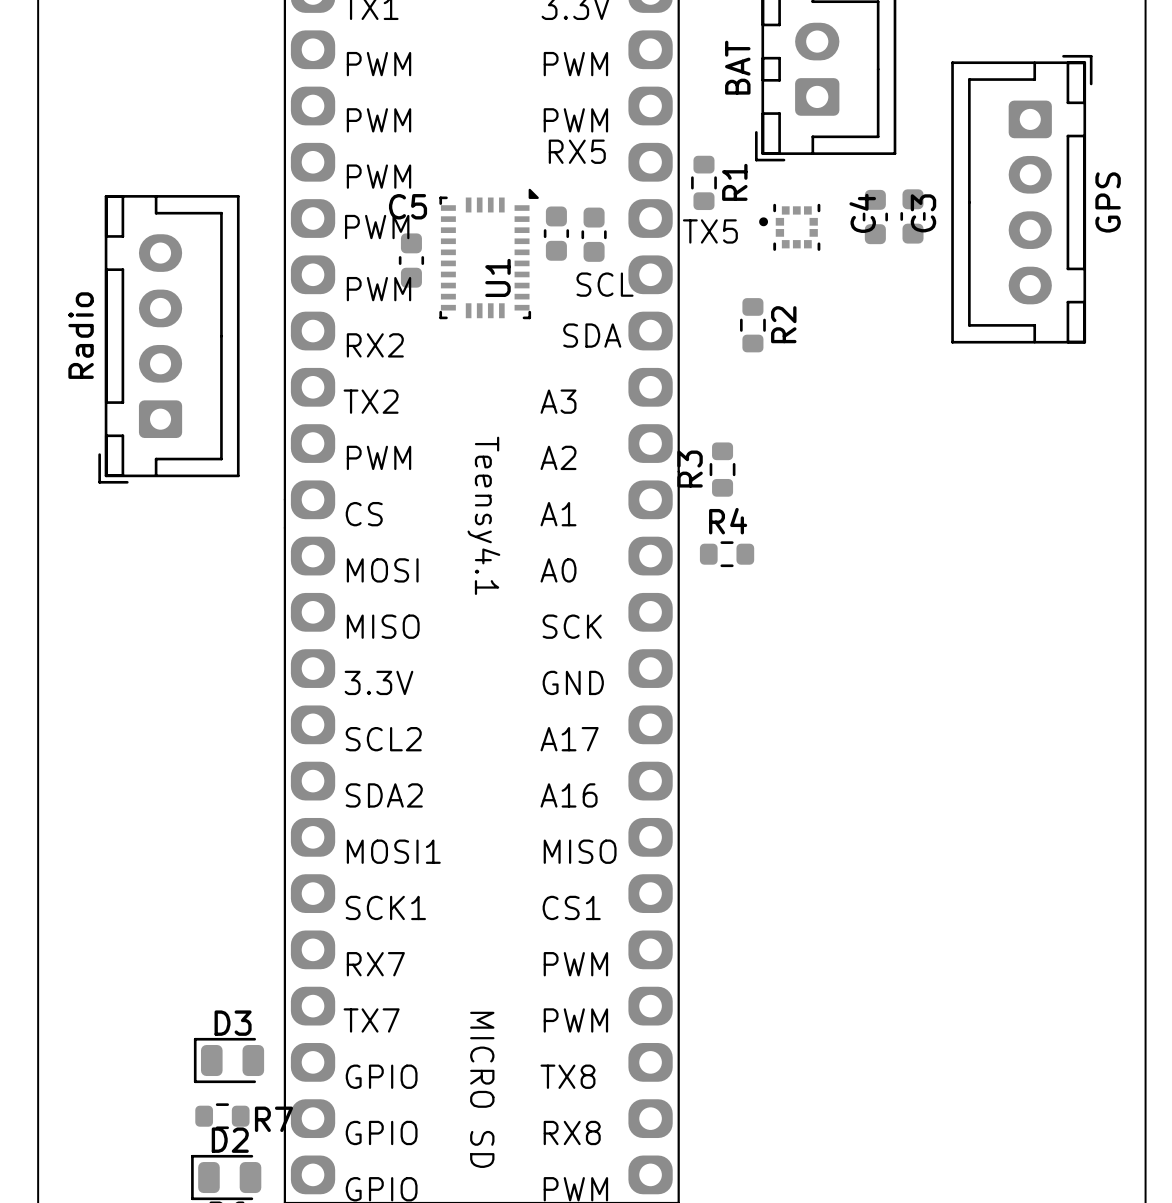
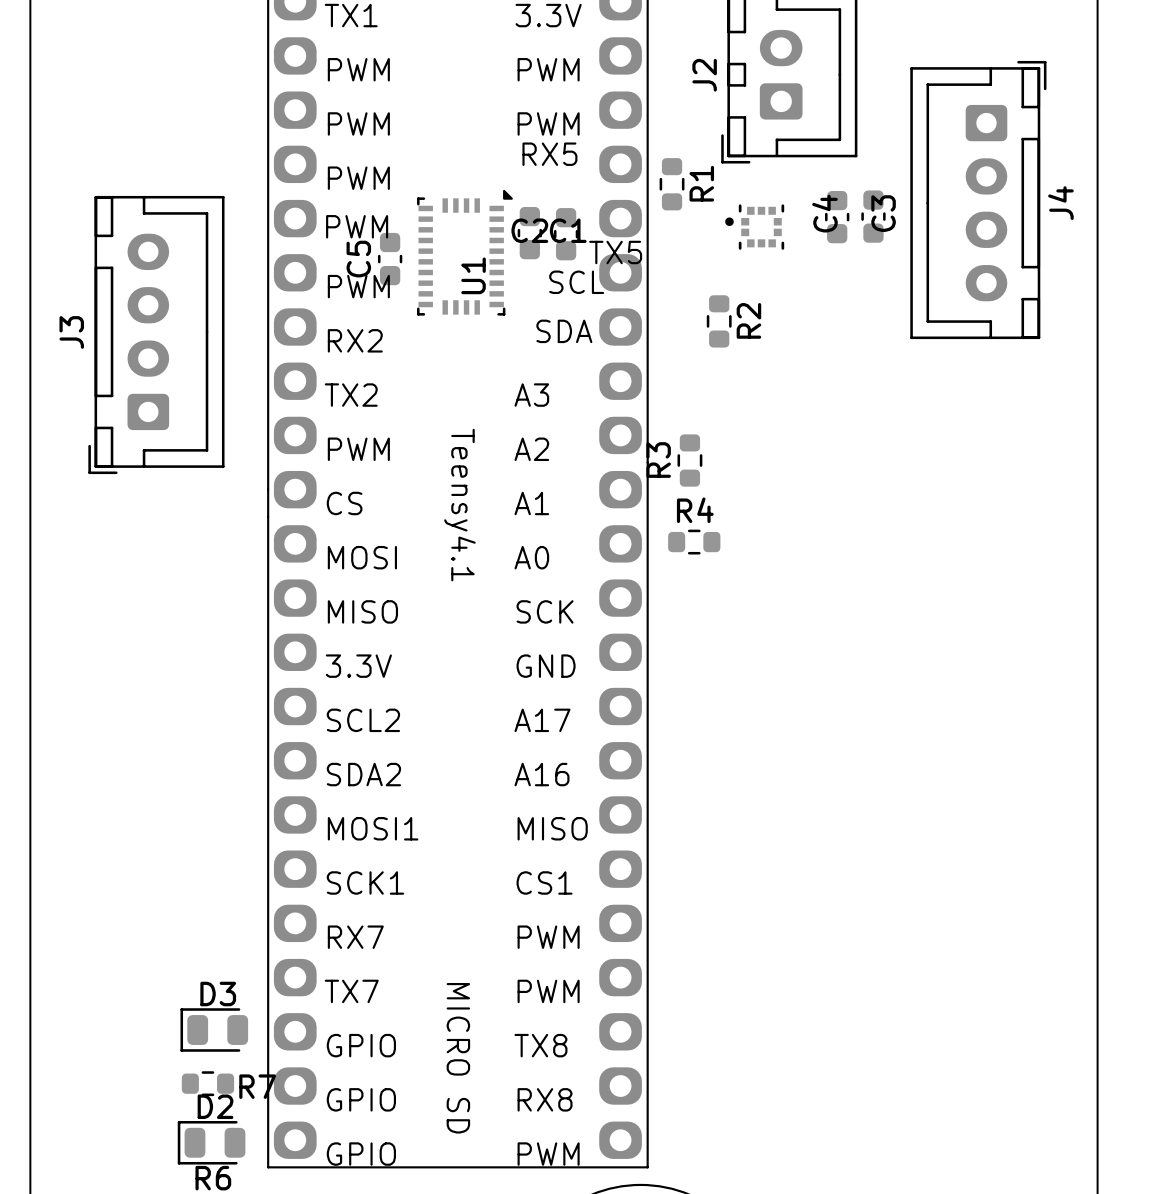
BAT name: BAT (737, 67) -> J2 (704, 75)
GPS name: GPS (1108, 202) -> J4 (1060, 203)
C5 name rotation: 0° (408, 206) -> 90° counterclockwise (358, 259)
C5 name position: C5 (408, 206) -> C5 (358, 259)
C2 name: none -> C2 (529, 230)
C1 name: none -> C1 (568, 230)
Teensy4.1 text position: TX5 (710, 231) -> TX5 (615, 252)
Radio name: Radio (81, 335) -> J3 (71, 332)

